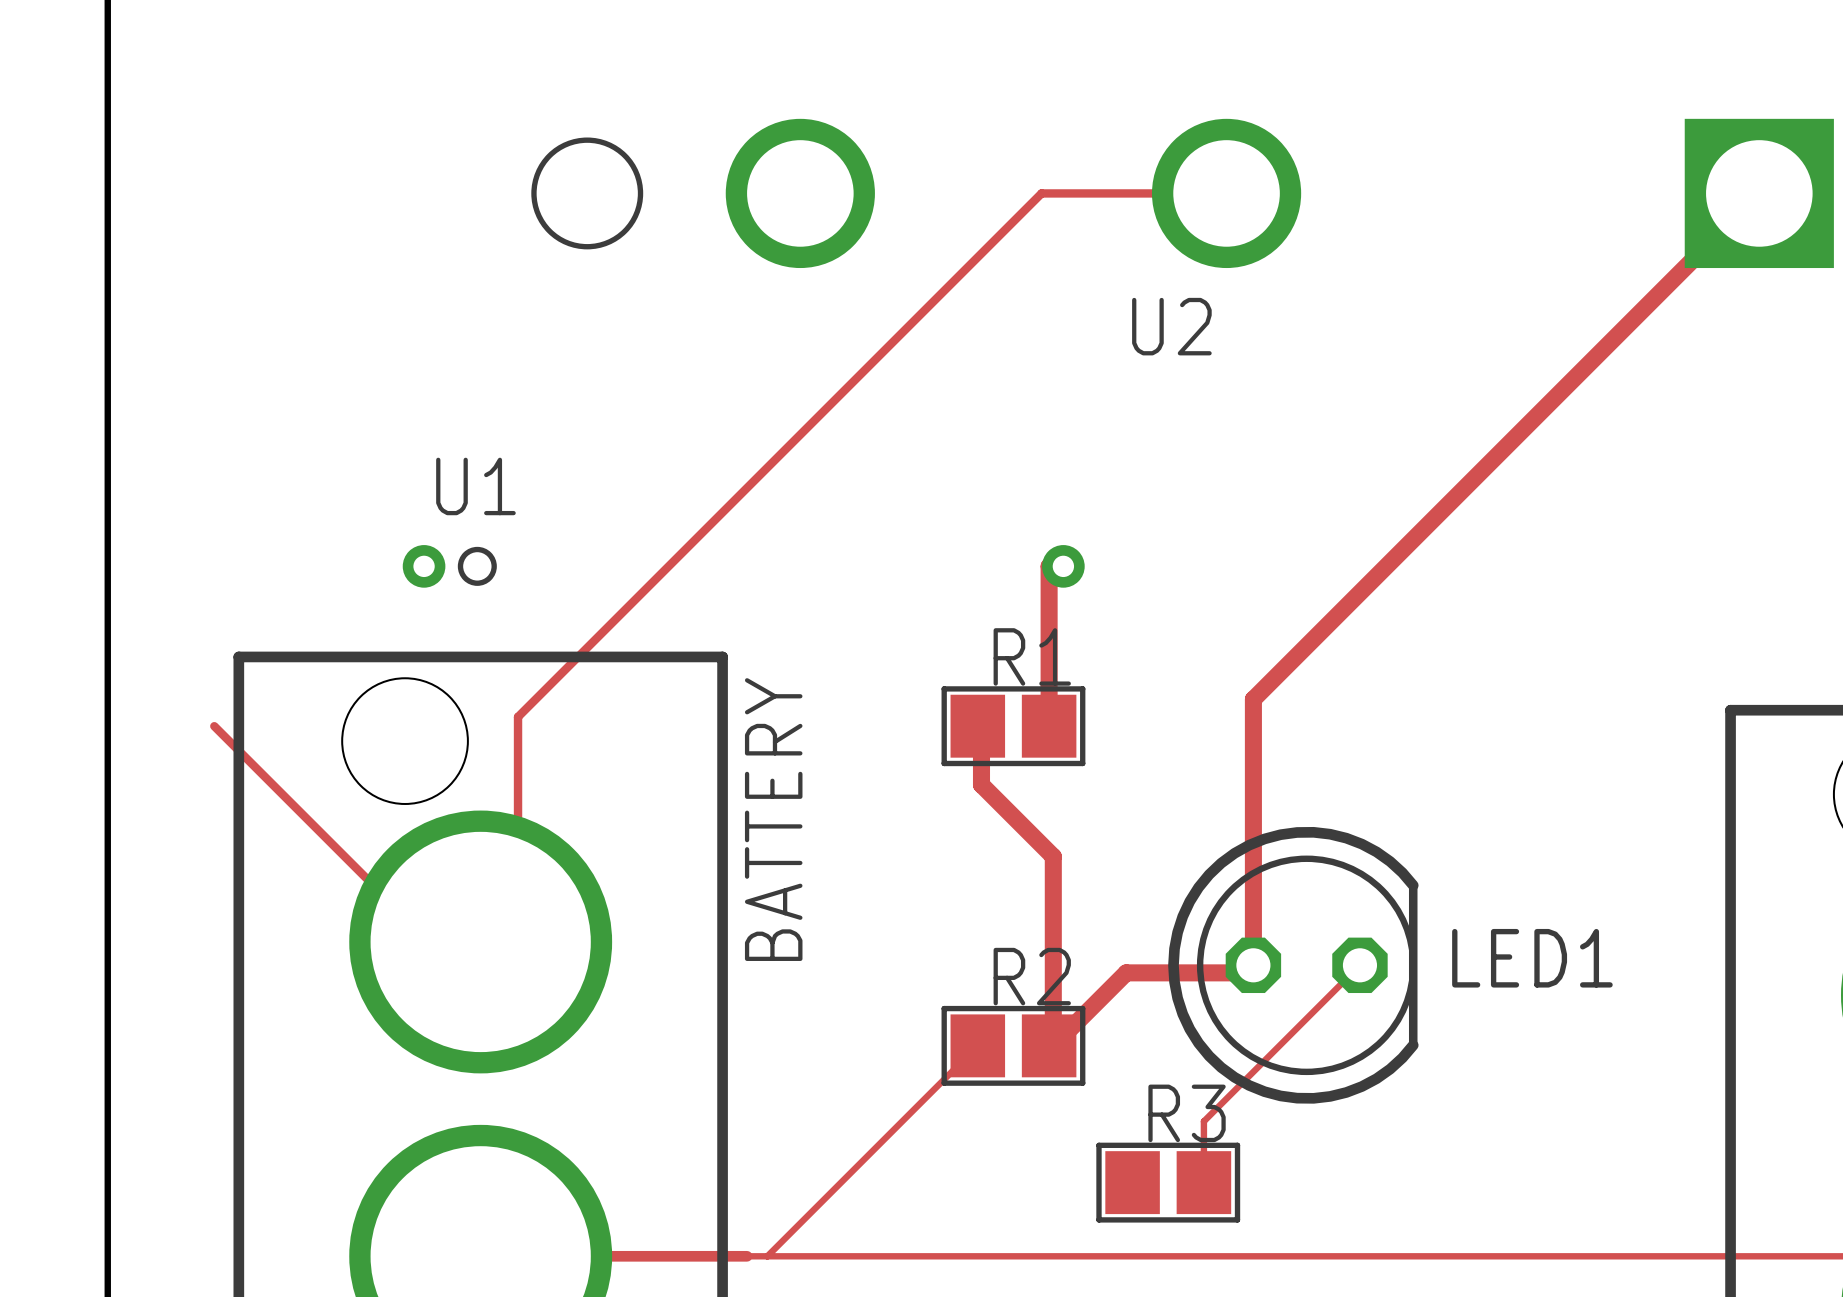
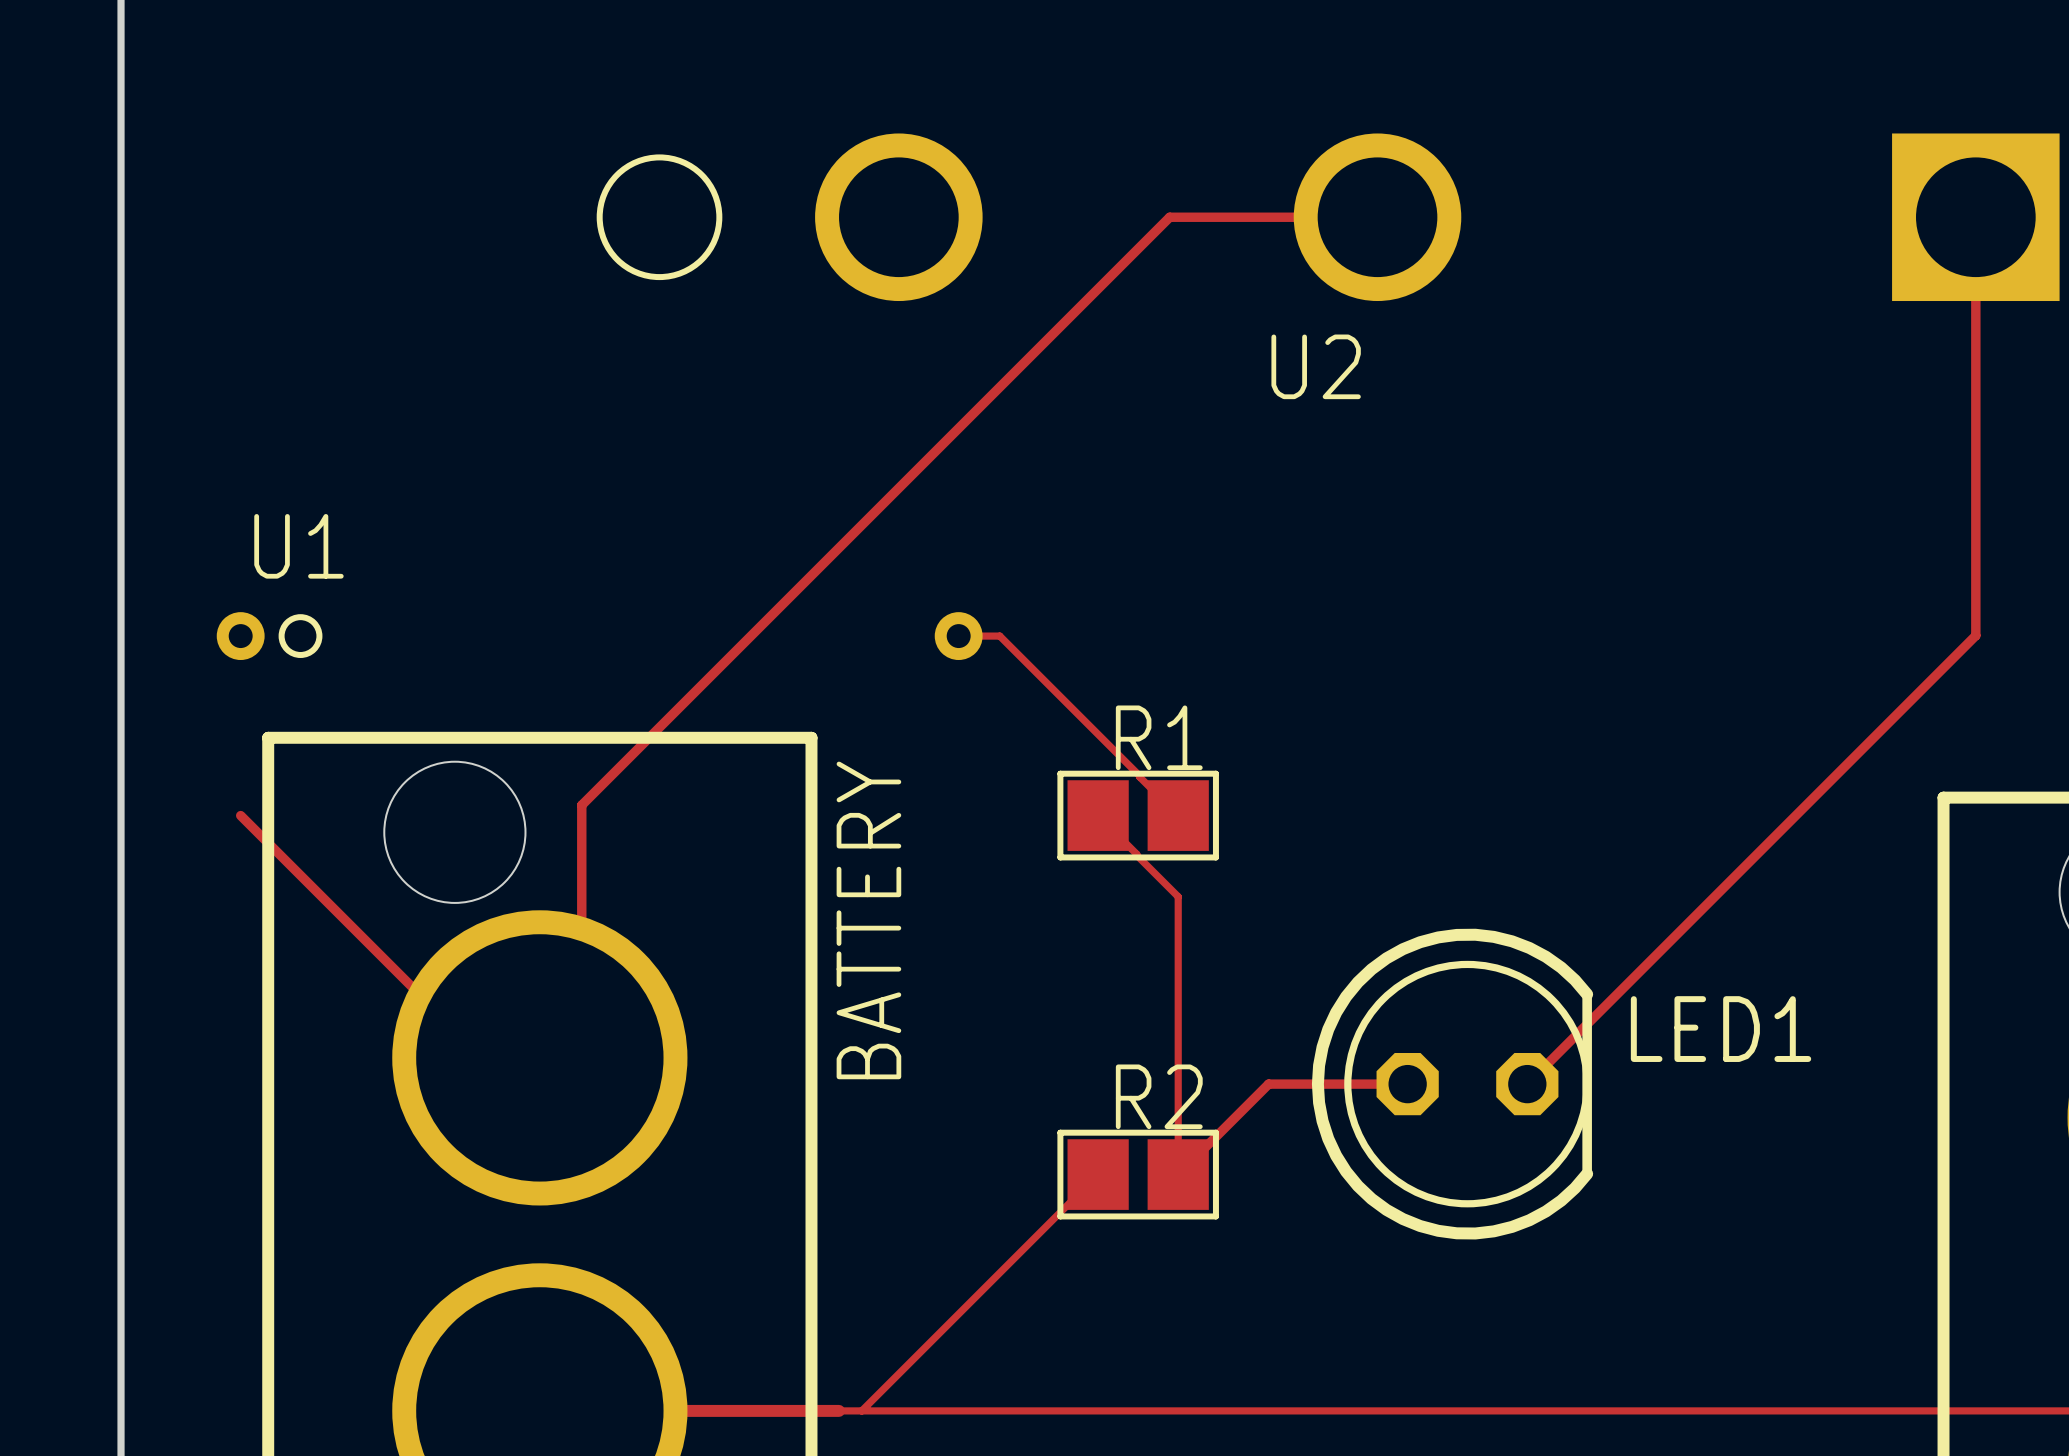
track: (1759, 193) (1253, 699) (1253, 965) (1245, 972) (1126, 972) (1053, 1045) (1053, 856) (981, 784) (981, 729) -> (1975, 217) (1975, 635) (1527, 1084)
U1 position: (743, 566) -> (599, 636)
track: (1063, 566) (1049, 566) (1049, 726) -> (958, 636) (999, 636) (1178, 815)
track: none -> (1102, 819) (1178, 896) (1178, 1174) (1268, 1084) (1407, 1084)
LED1 name position: LED1 (1532, 958) -> LED1 (1721, 1029)
track: (1359, 965) (1203, 1121) (1203, 1182) -> none
R3: (1168, 1182) -> none

